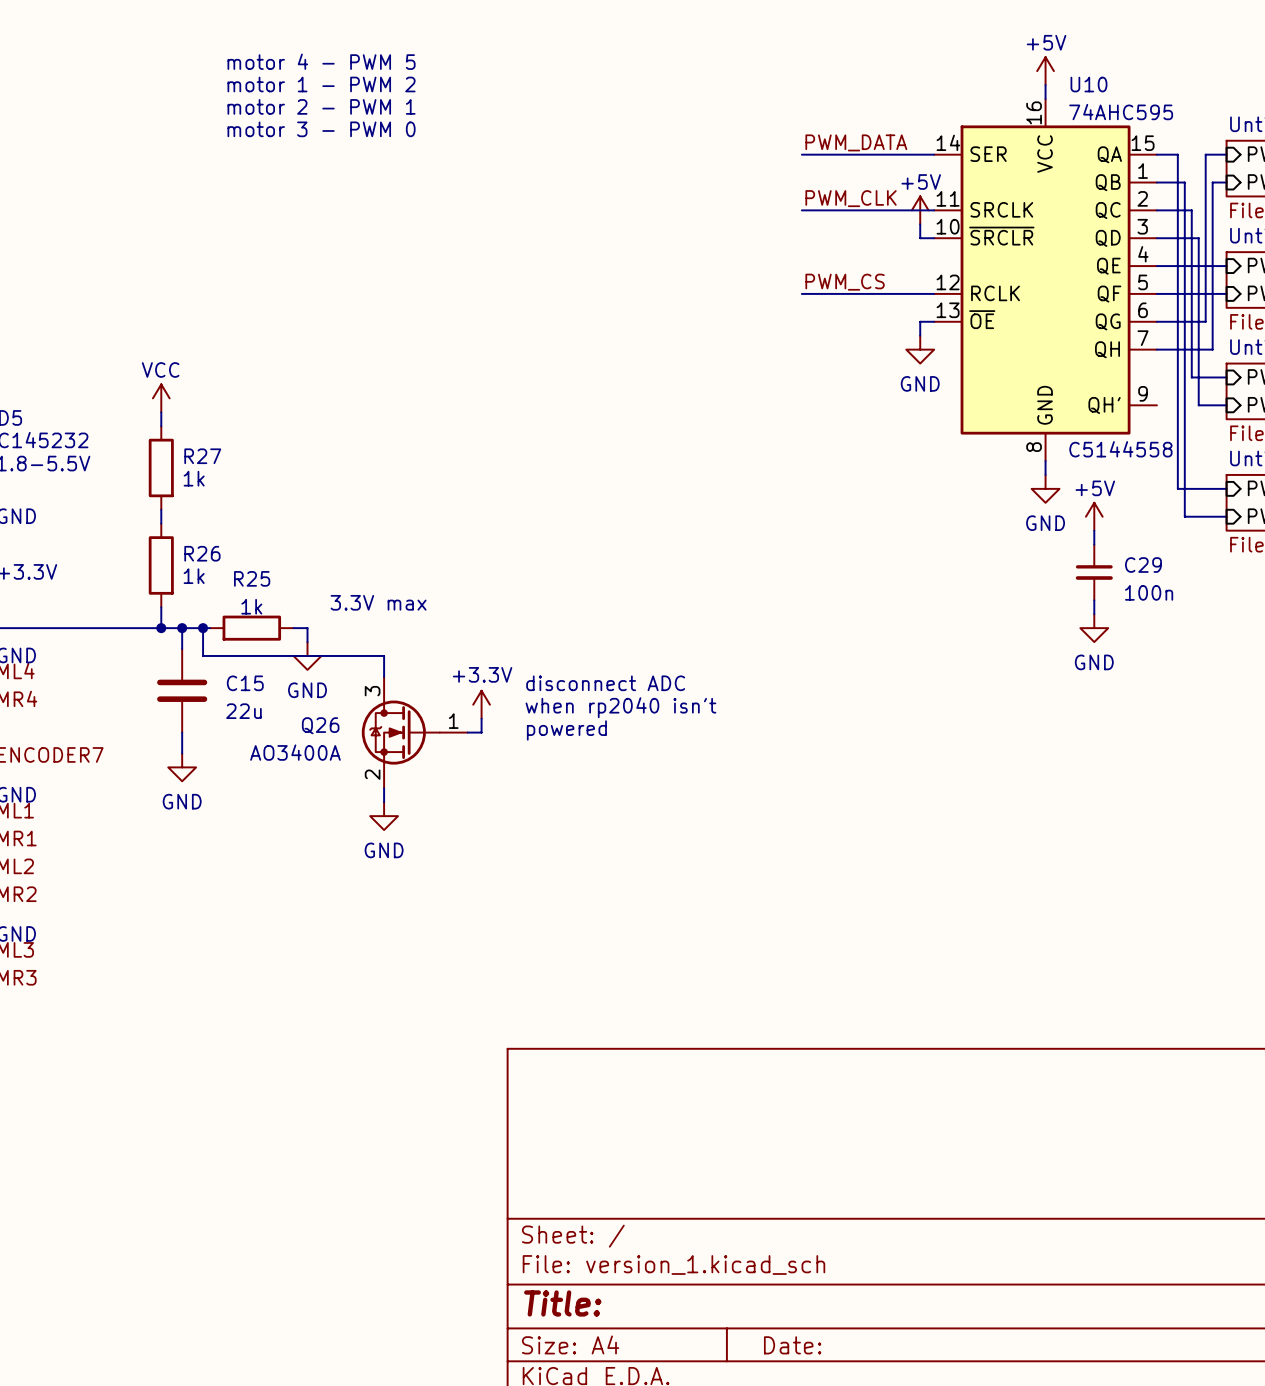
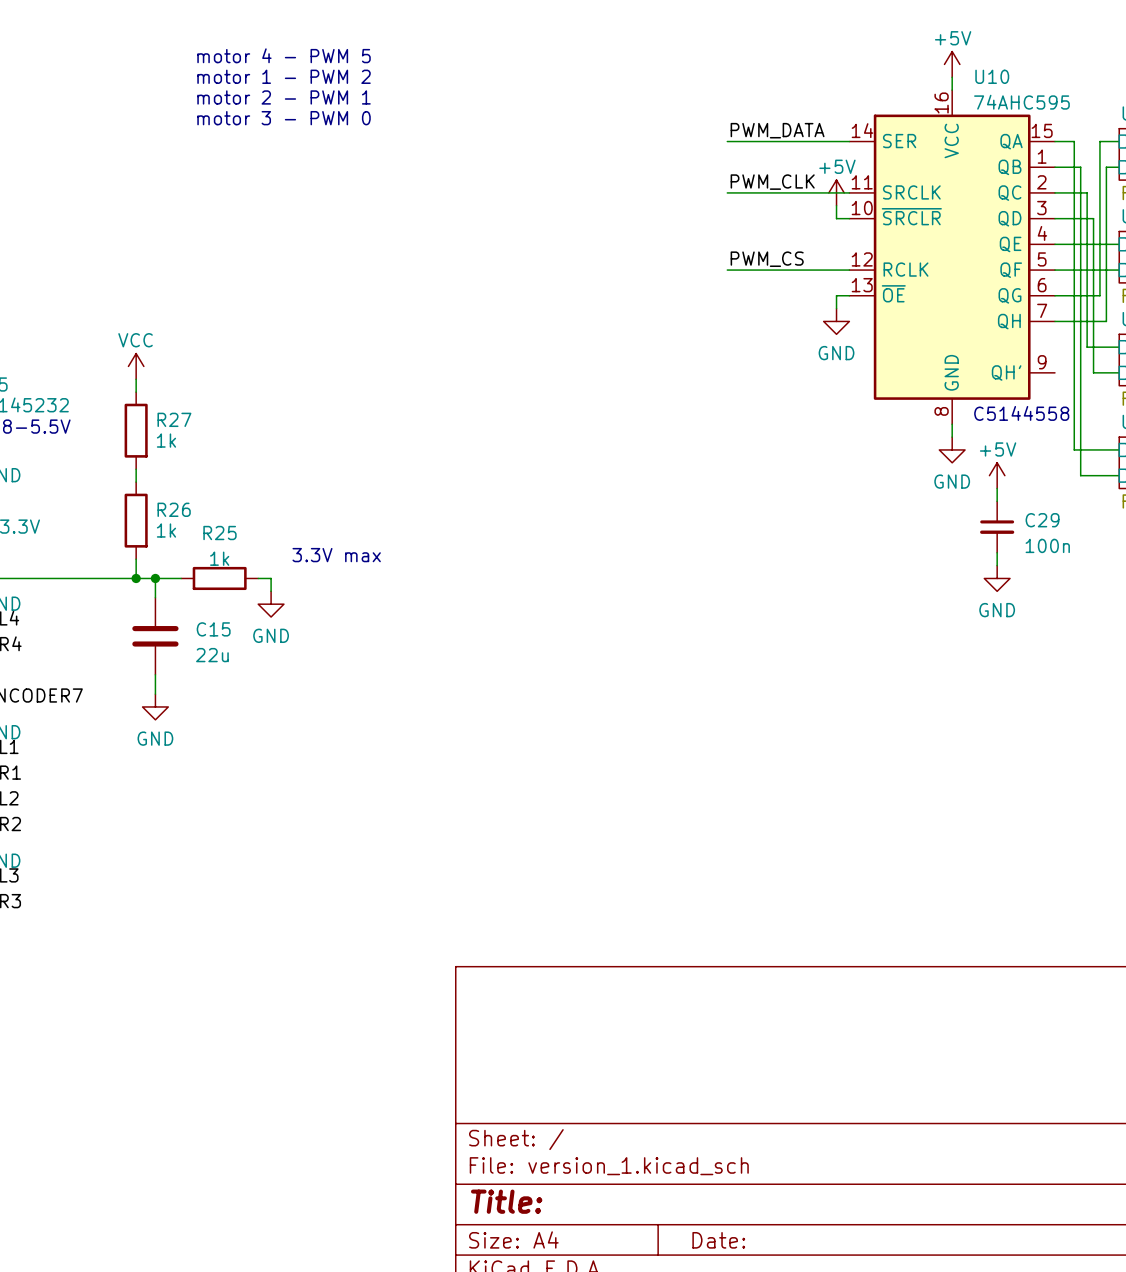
wire: (203, 628) (203, 655) (384, 655) (384, 676) -> none
junction: (203, 628) -> none
text: disconnect ADC (605, 683) -> none
power symbol: +3.3V (481, 704) -> none
text: when rp2040 isn't (620, 707) -> none
wire: (481, 718) (481, 732) (467, 732) -> none
text: powered (566, 730) -> none
Q26: AO3400A (414, 732) -> none
wire: (384, 788) (384, 802) -> none
power symbol: GND (384, 816) -> none

